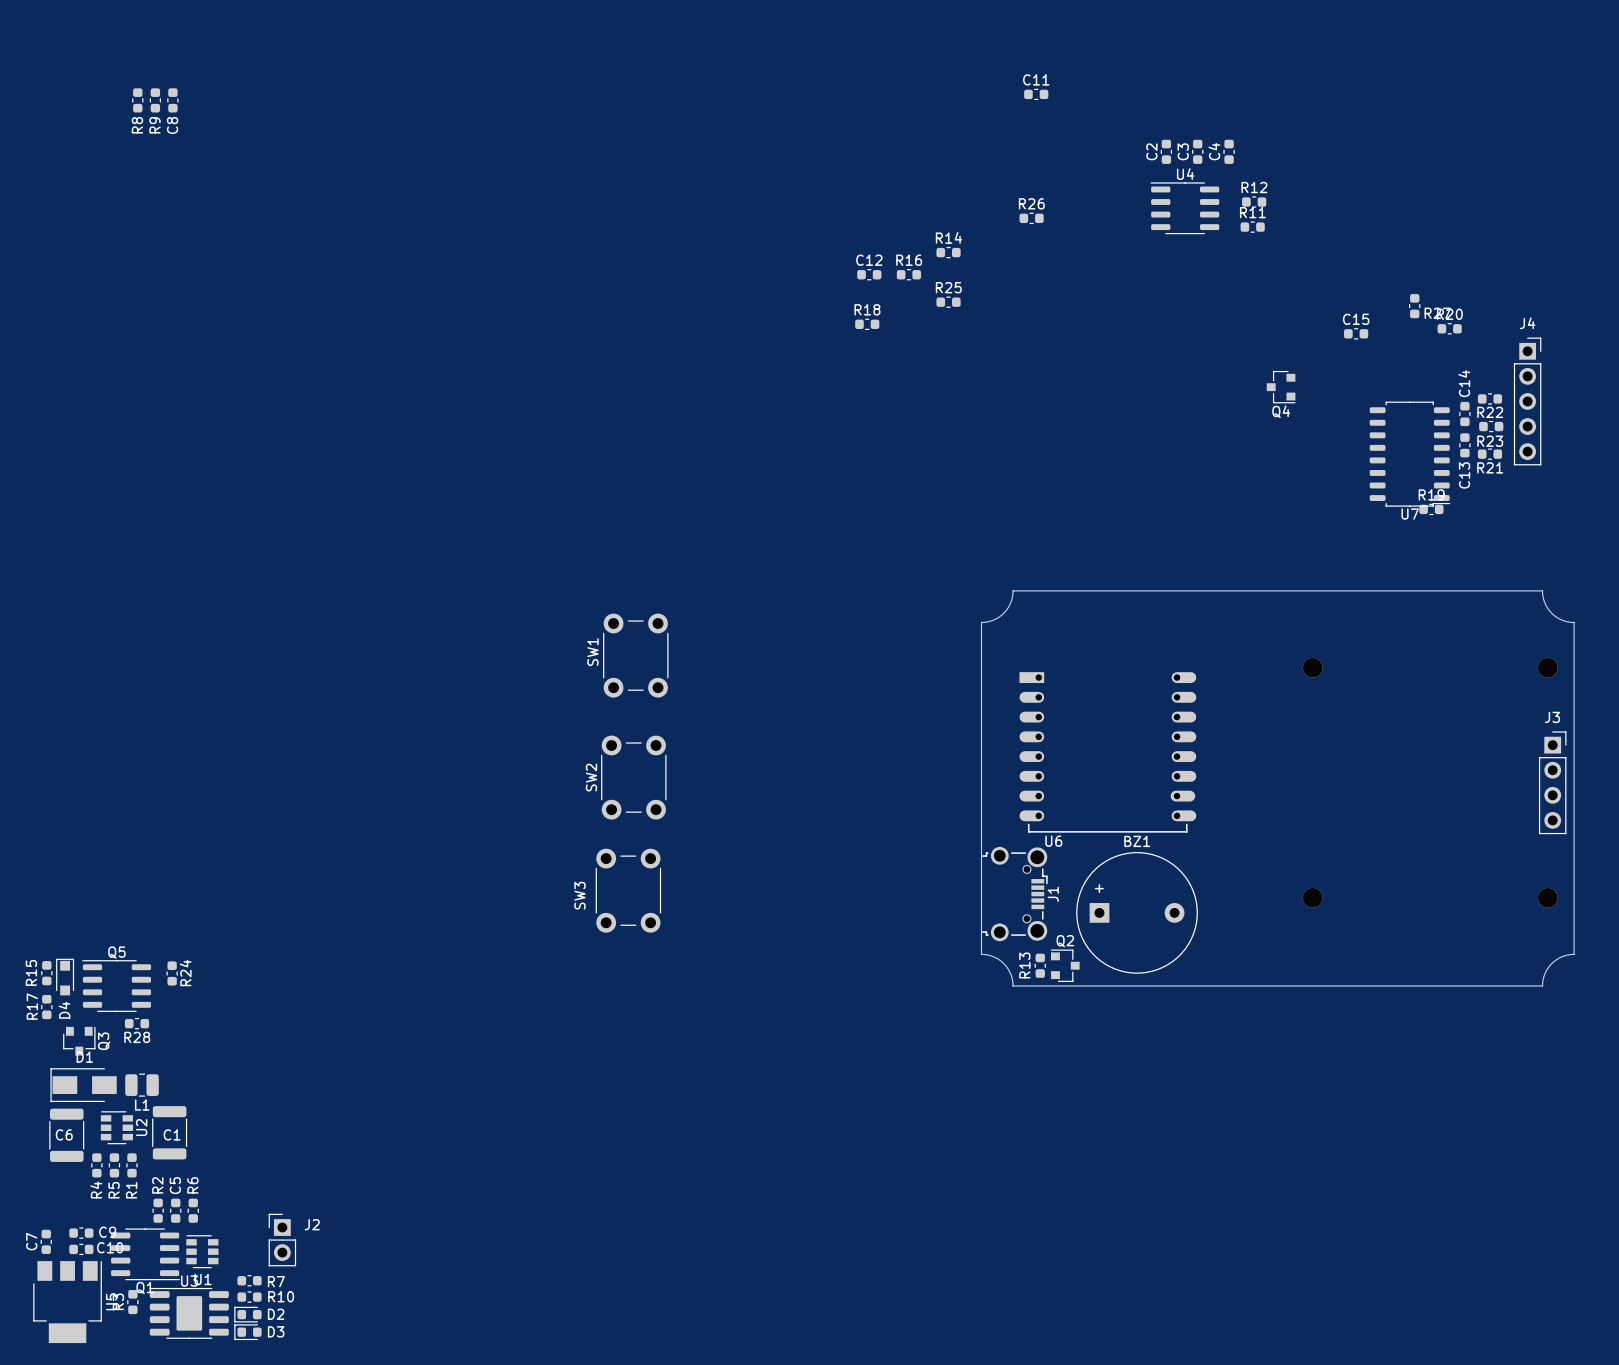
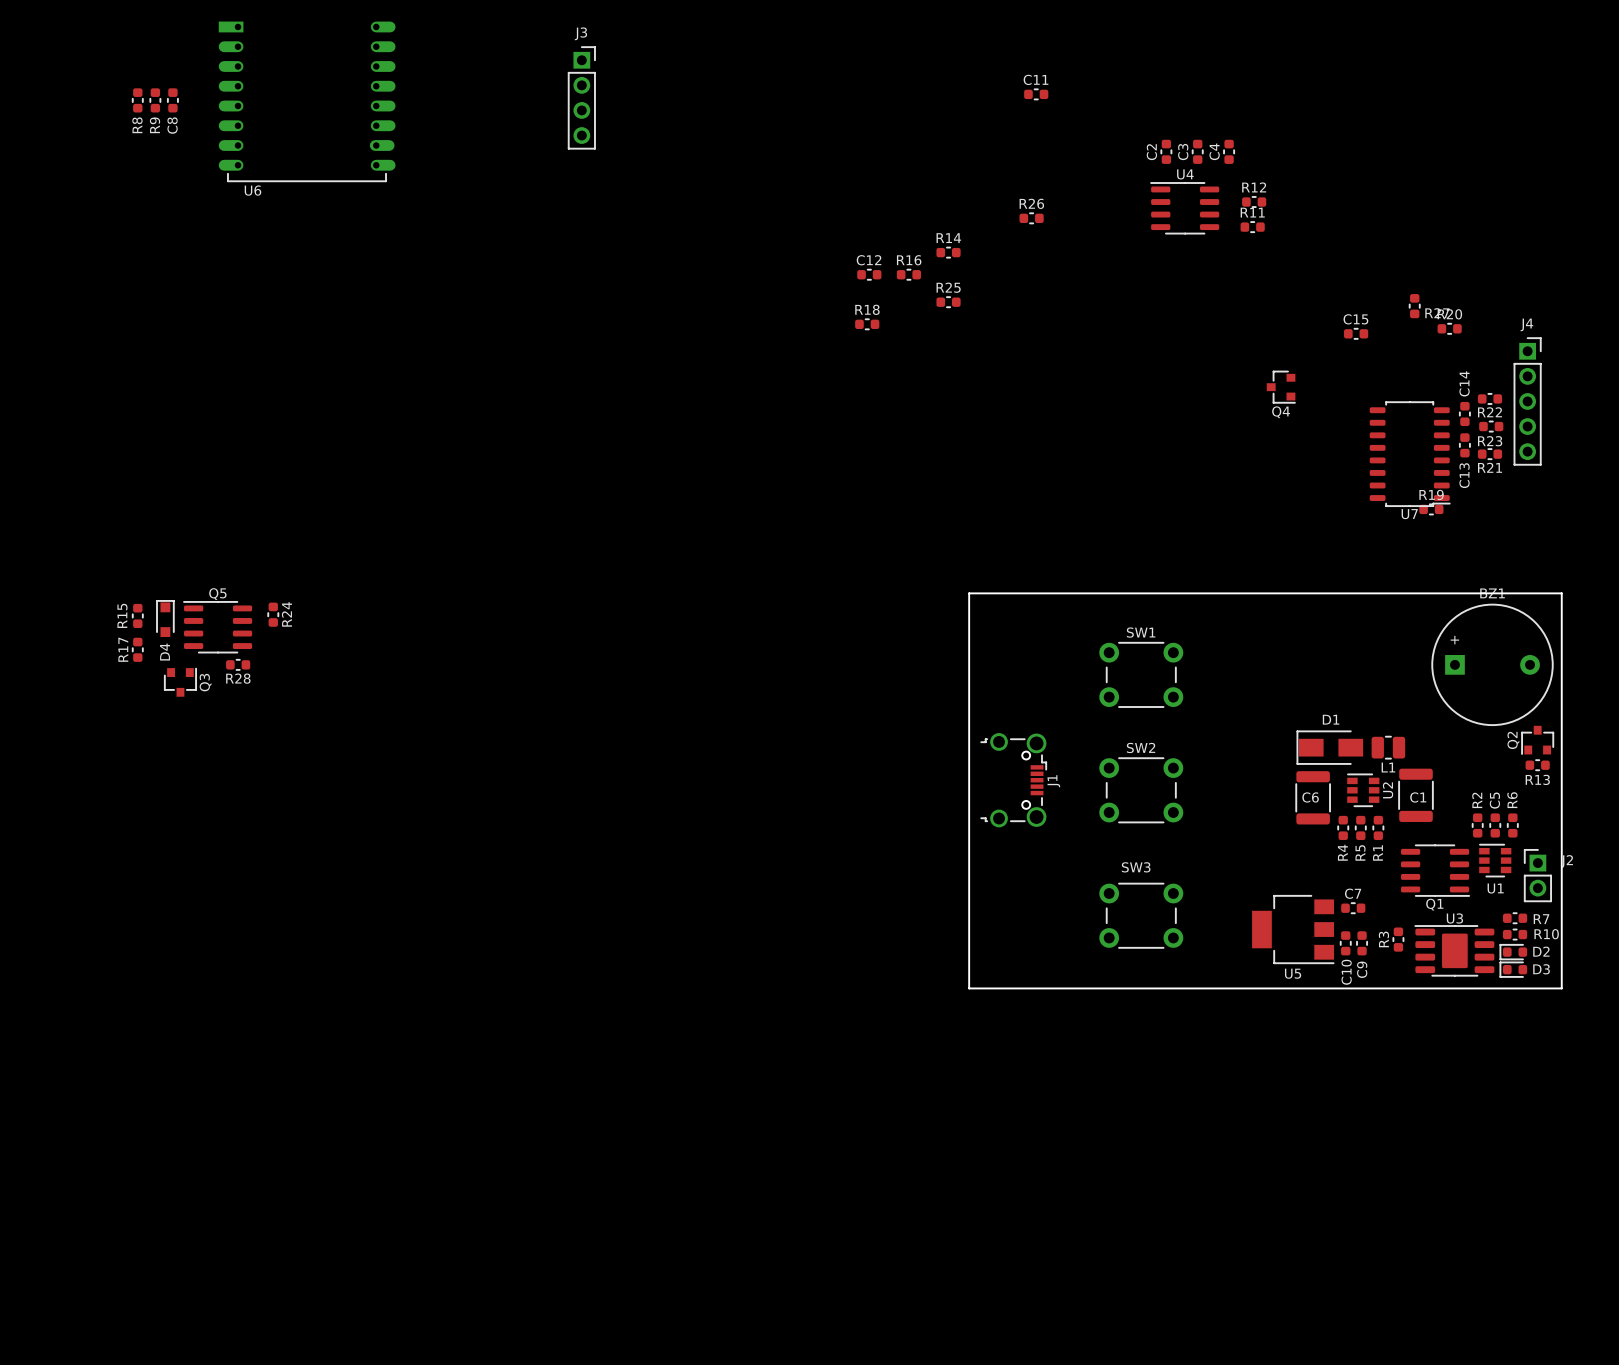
board edge: (1013, 590) (1542, 590) (1544, 601) (1551, 613) (1563, 620) (1574, 622) (1574, 954) (1563, 956) (1551, 963) (1545, 972) (1542, 985) (1013, 985) (1011, 975) (1003, 963) (991, 956) (981, 954) (981, 622) (991, 620) (1003, 613) (1009, 604) (1013, 590) -> (969, 593) (969, 988) (1561, 988) (1561, 593) (969, 593)
SW1 rotation: 0° (635, 655) -> 90° clockwise (1141, 674)
SW1 position: (635, 655) -> (1141, 674)
via: (1312, 667) -> none
via: (1547, 667) -> none
U6 position: (1107, 752) -> (307, 101)
SW2 rotation: 0° (633, 777) -> 90° clockwise (1141, 790)
SW2 position: (633, 777) -> (1141, 790)
J3 position: (1552, 782) -> (581, 97)
SW3 rotation: 0° (628, 890) -> 90° clockwise (1141, 915)
SW3 position: (628, 890) -> (1141, 915)
J1 position: (1014, 894) -> (1013, 780)
via: (1312, 897) -> none
via: (1547, 897) -> none
BZ1 position: (1137, 912) -> (1492, 664)
R13 name position: R13 (1024, 965) -> R13 (1537, 779)
R13 rotation: 0° (1040, 965) -> 90° clockwise (1537, 765)
R13 position: (1040, 965) -> (1537, 765)
Q2 rotation: 0° (1065, 965) -> 90° counterclockwise (1537, 740)
Q2 position: (1065, 965) -> (1537, 740)
R15 position: (46, 973) -> (137, 615)
R24 position: (172, 973) -> (273, 614)
D4 position: (65, 977) -> (165, 618)
Q5 position: (116, 986) -> (217, 627)
R17 position: (46, 1007) -> (137, 649)
R28 position: (137, 1023) -> (238, 664)
Q3 position: (79, 1041) -> (180, 682)
D1 position: (83, 1085) -> (1329, 747)
L1 position: (142, 1085) -> (1388, 747)
U2 position: (116, 1127) -> (1363, 790)
C1 position: (169, 1132) -> (1415, 795)
C6 position: (66, 1135) -> (1313, 797)
R4 position: (96, 1165) -> (1343, 827)
R5 position: (114, 1165) -> (1360, 827)
R1 position: (131, 1165) -> (1378, 827)
R2 position: (158, 1210) -> (1477, 825)
C5 position: (175, 1210) -> (1495, 825)
R6 position: (193, 1210) -> (1512, 825)
C9 rotation: 0° (81, 1233) -> 90° clockwise (1362, 943)
C9 position: (81, 1233) -> (1362, 943)
J2 position: (282, 1240) -> (1537, 875)
C7 rotation: 0° (46, 1241) -> 90° clockwise (1353, 908)
C7 position: (46, 1241) -> (1353, 908)
C10 rotation: 0° (81, 1249) -> 90° clockwise (1345, 943)
C10 position: (81, 1249) -> (1345, 943)
U1 position: (202, 1251) -> (1495, 860)
Q1 position: (145, 1254) -> (1435, 870)
R7 position: (249, 1280) -> (1515, 918)
R10 position: (249, 1297) -> (1515, 934)
U5 rotation: 0° (67, 1302) -> 90° clockwise (1293, 929)
U5 position: (67, 1302) -> (1293, 929)
R3 position: (132, 1302) -> (1398, 939)
U3 position: (189, 1313) -> (1454, 950)
D2 position: (247, 1314) -> (1513, 952)
D3 position: (247, 1332) -> (1513, 969)

